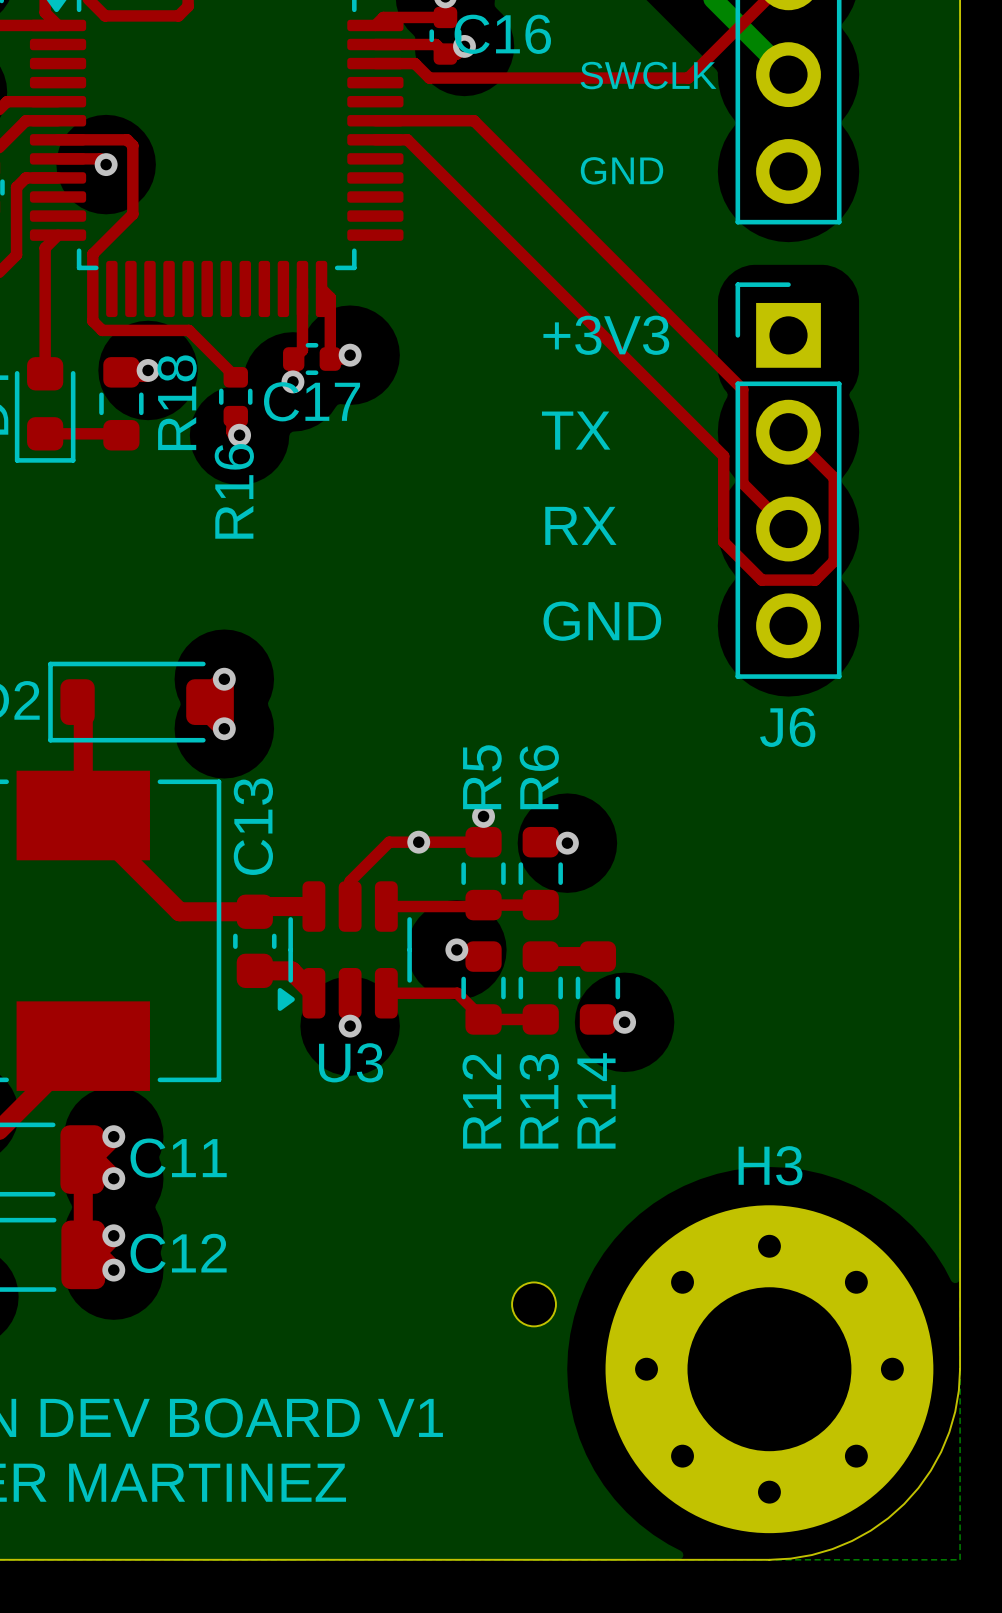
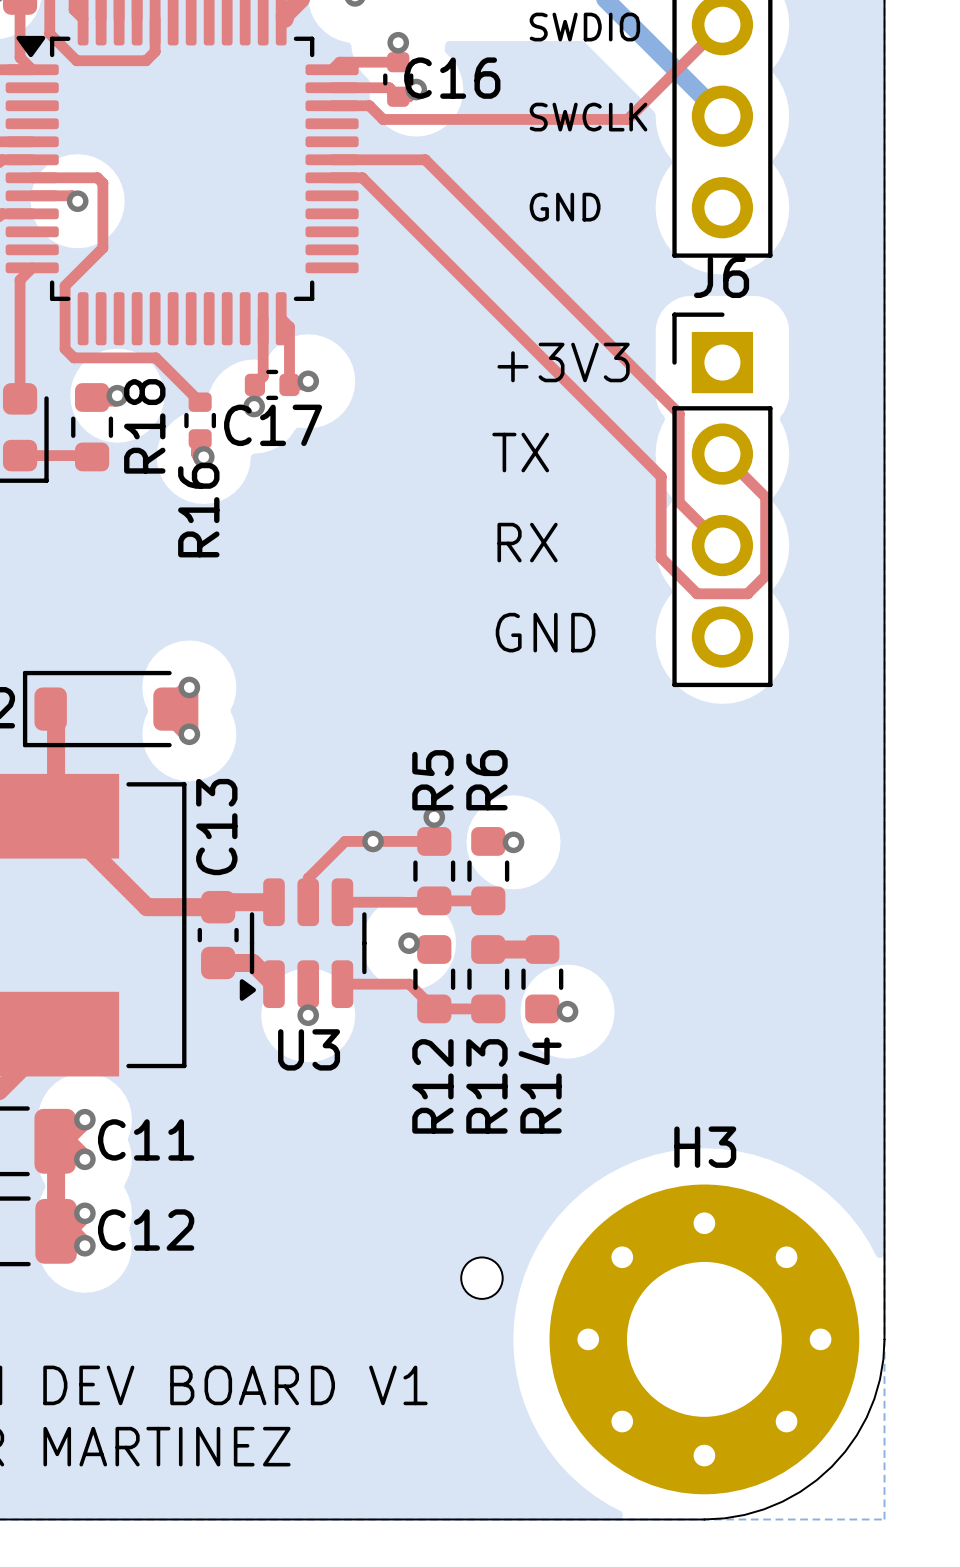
J6 name position: J6 (787, 727) -> J6 (721, 277)

